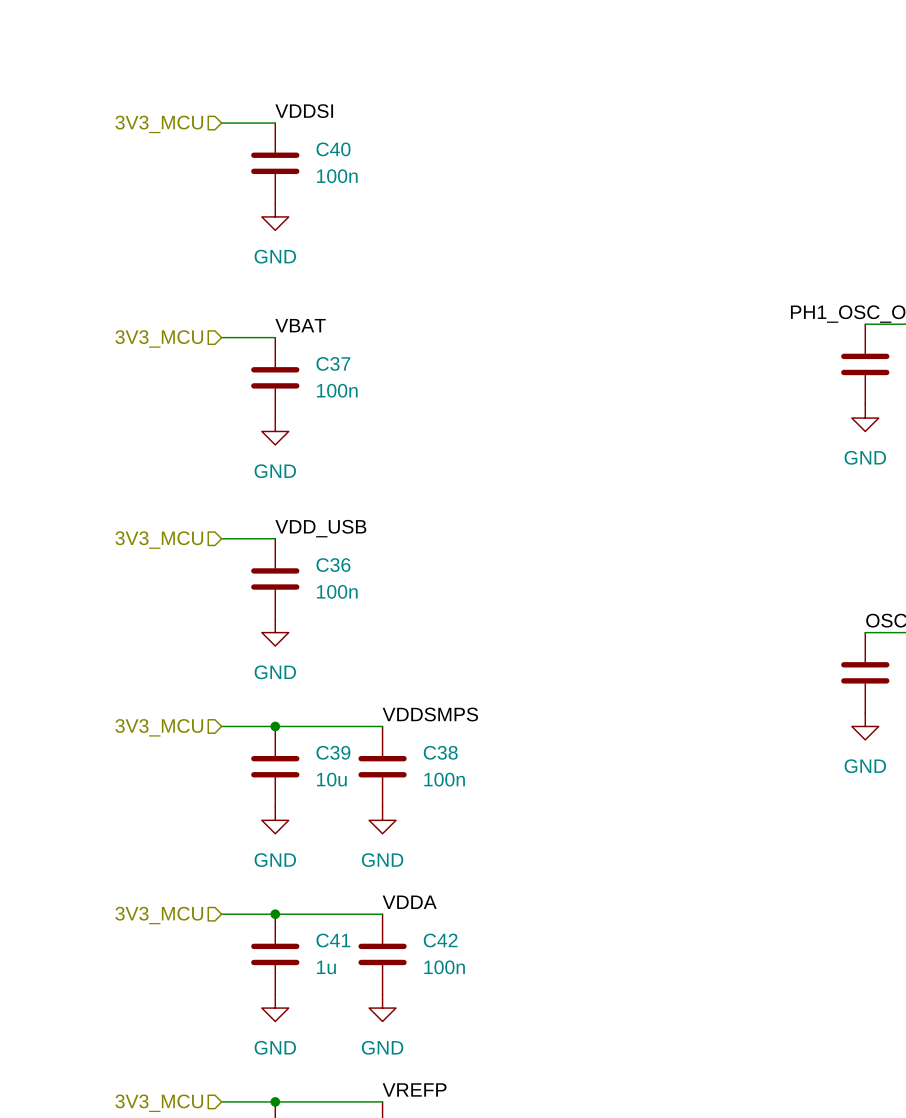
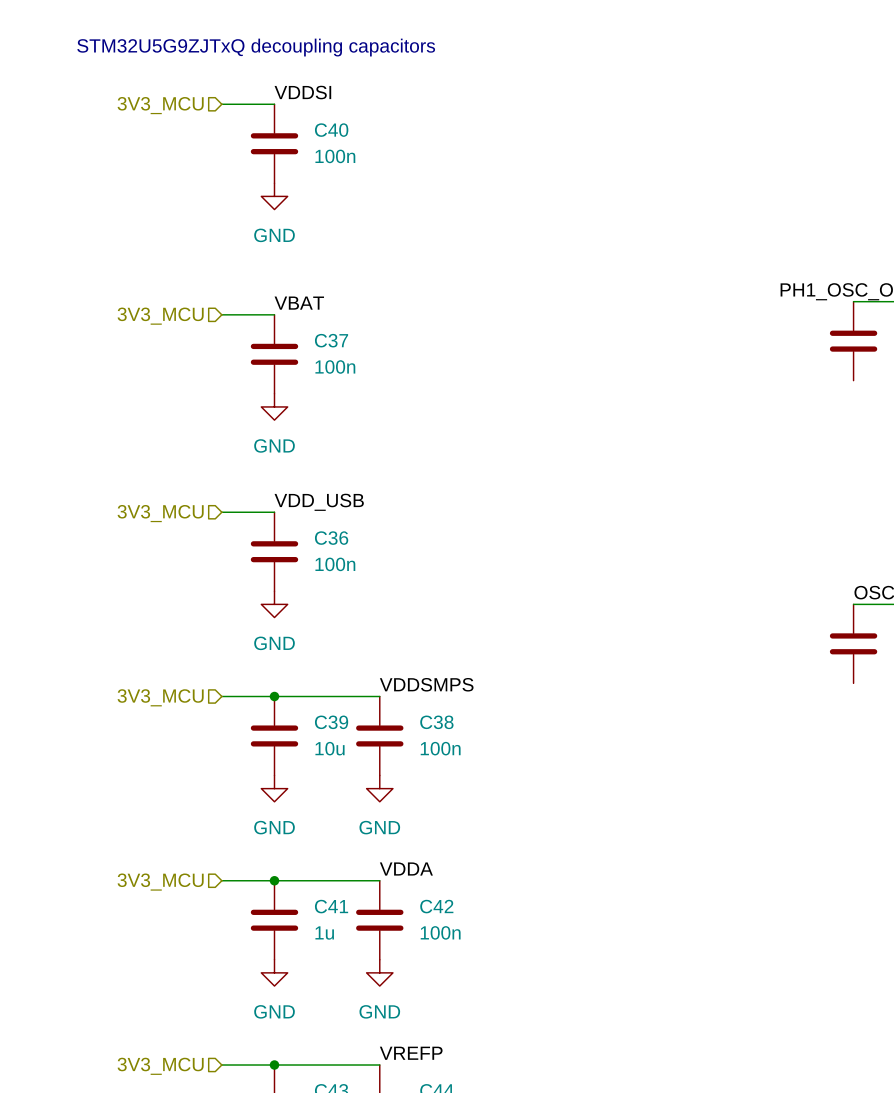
text: none -> STM32U5G9ZJTxQ decoupling capacitors (256, 47)
power symbol: GND (865, 418) -> none
power symbol: GND (865, 726) -> none

